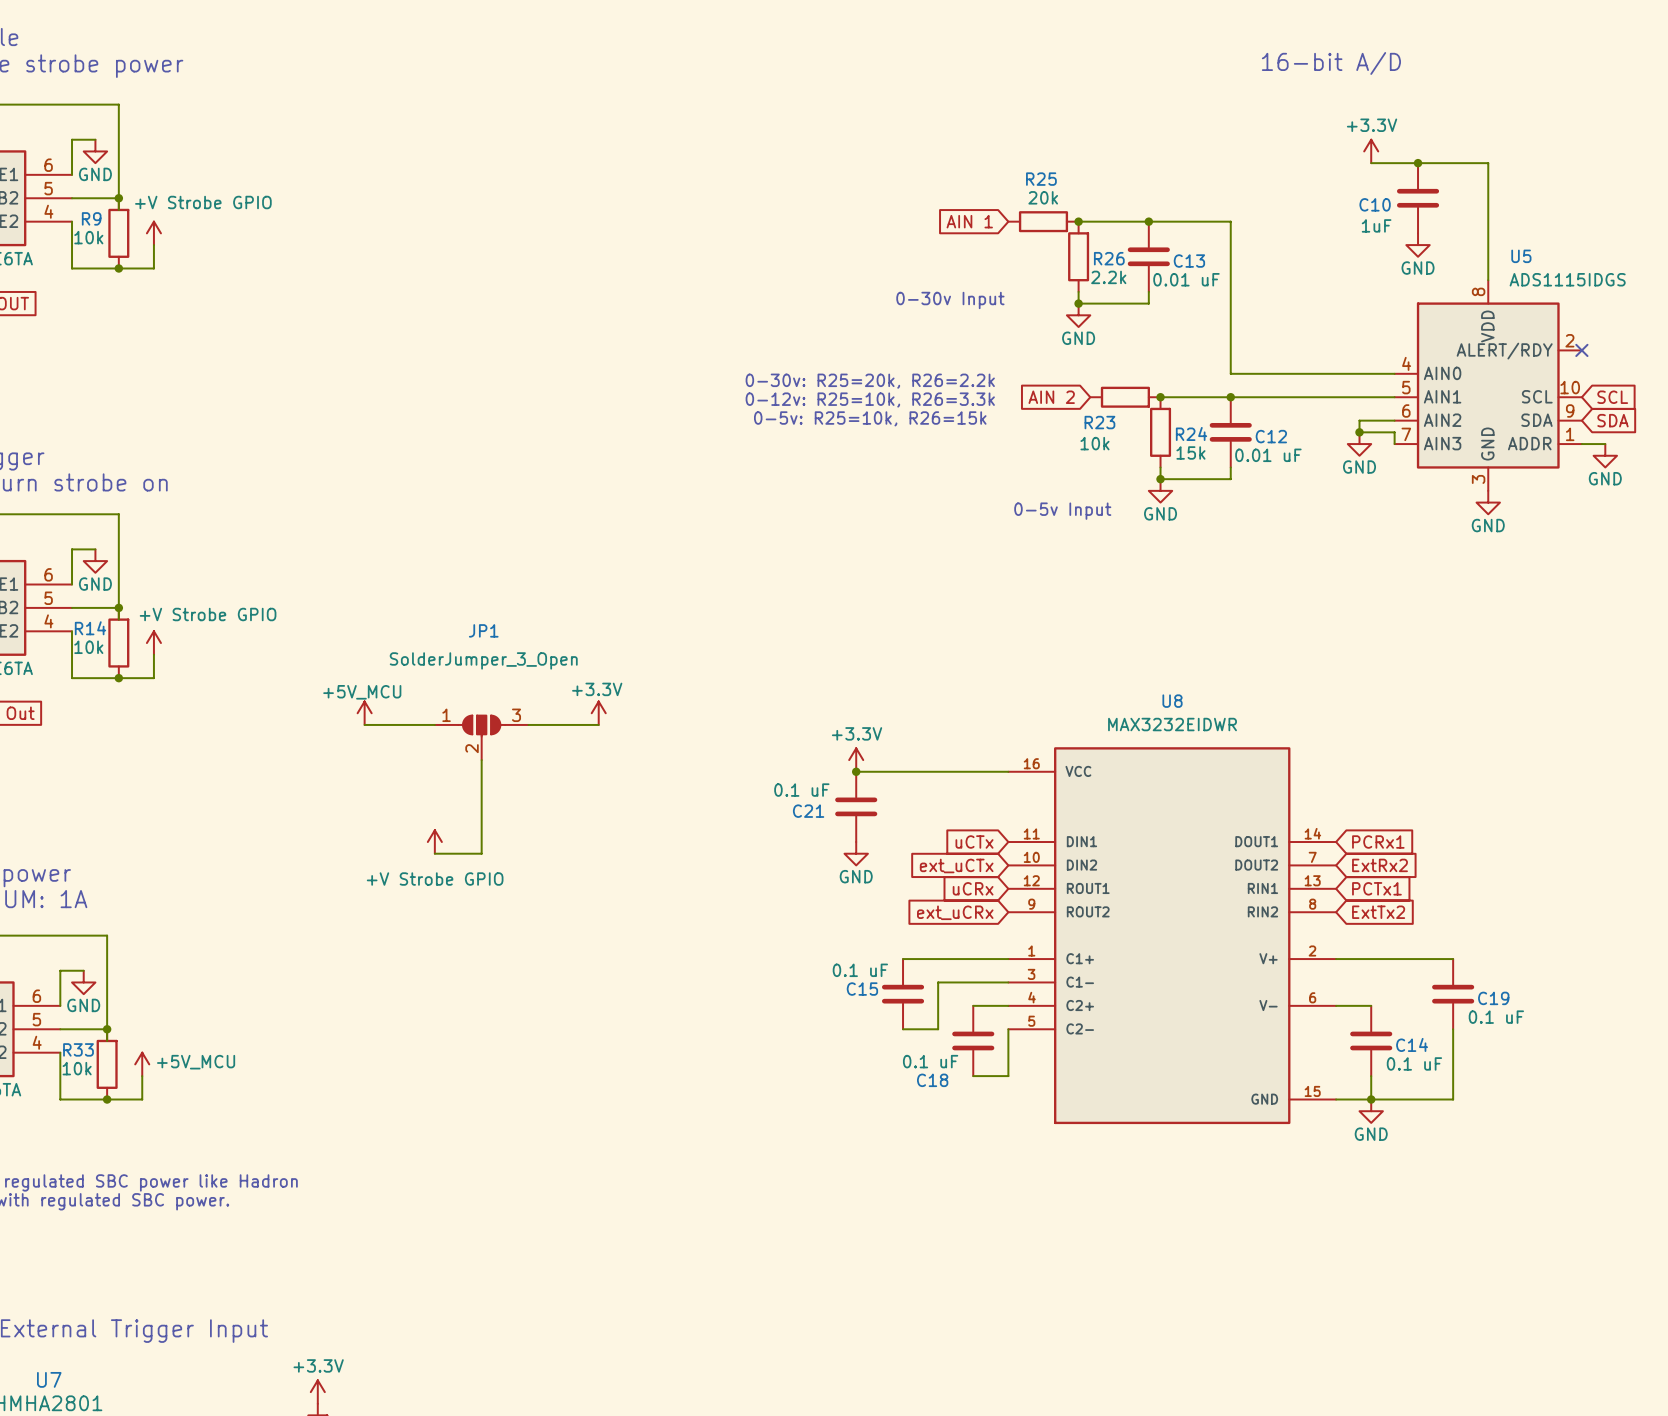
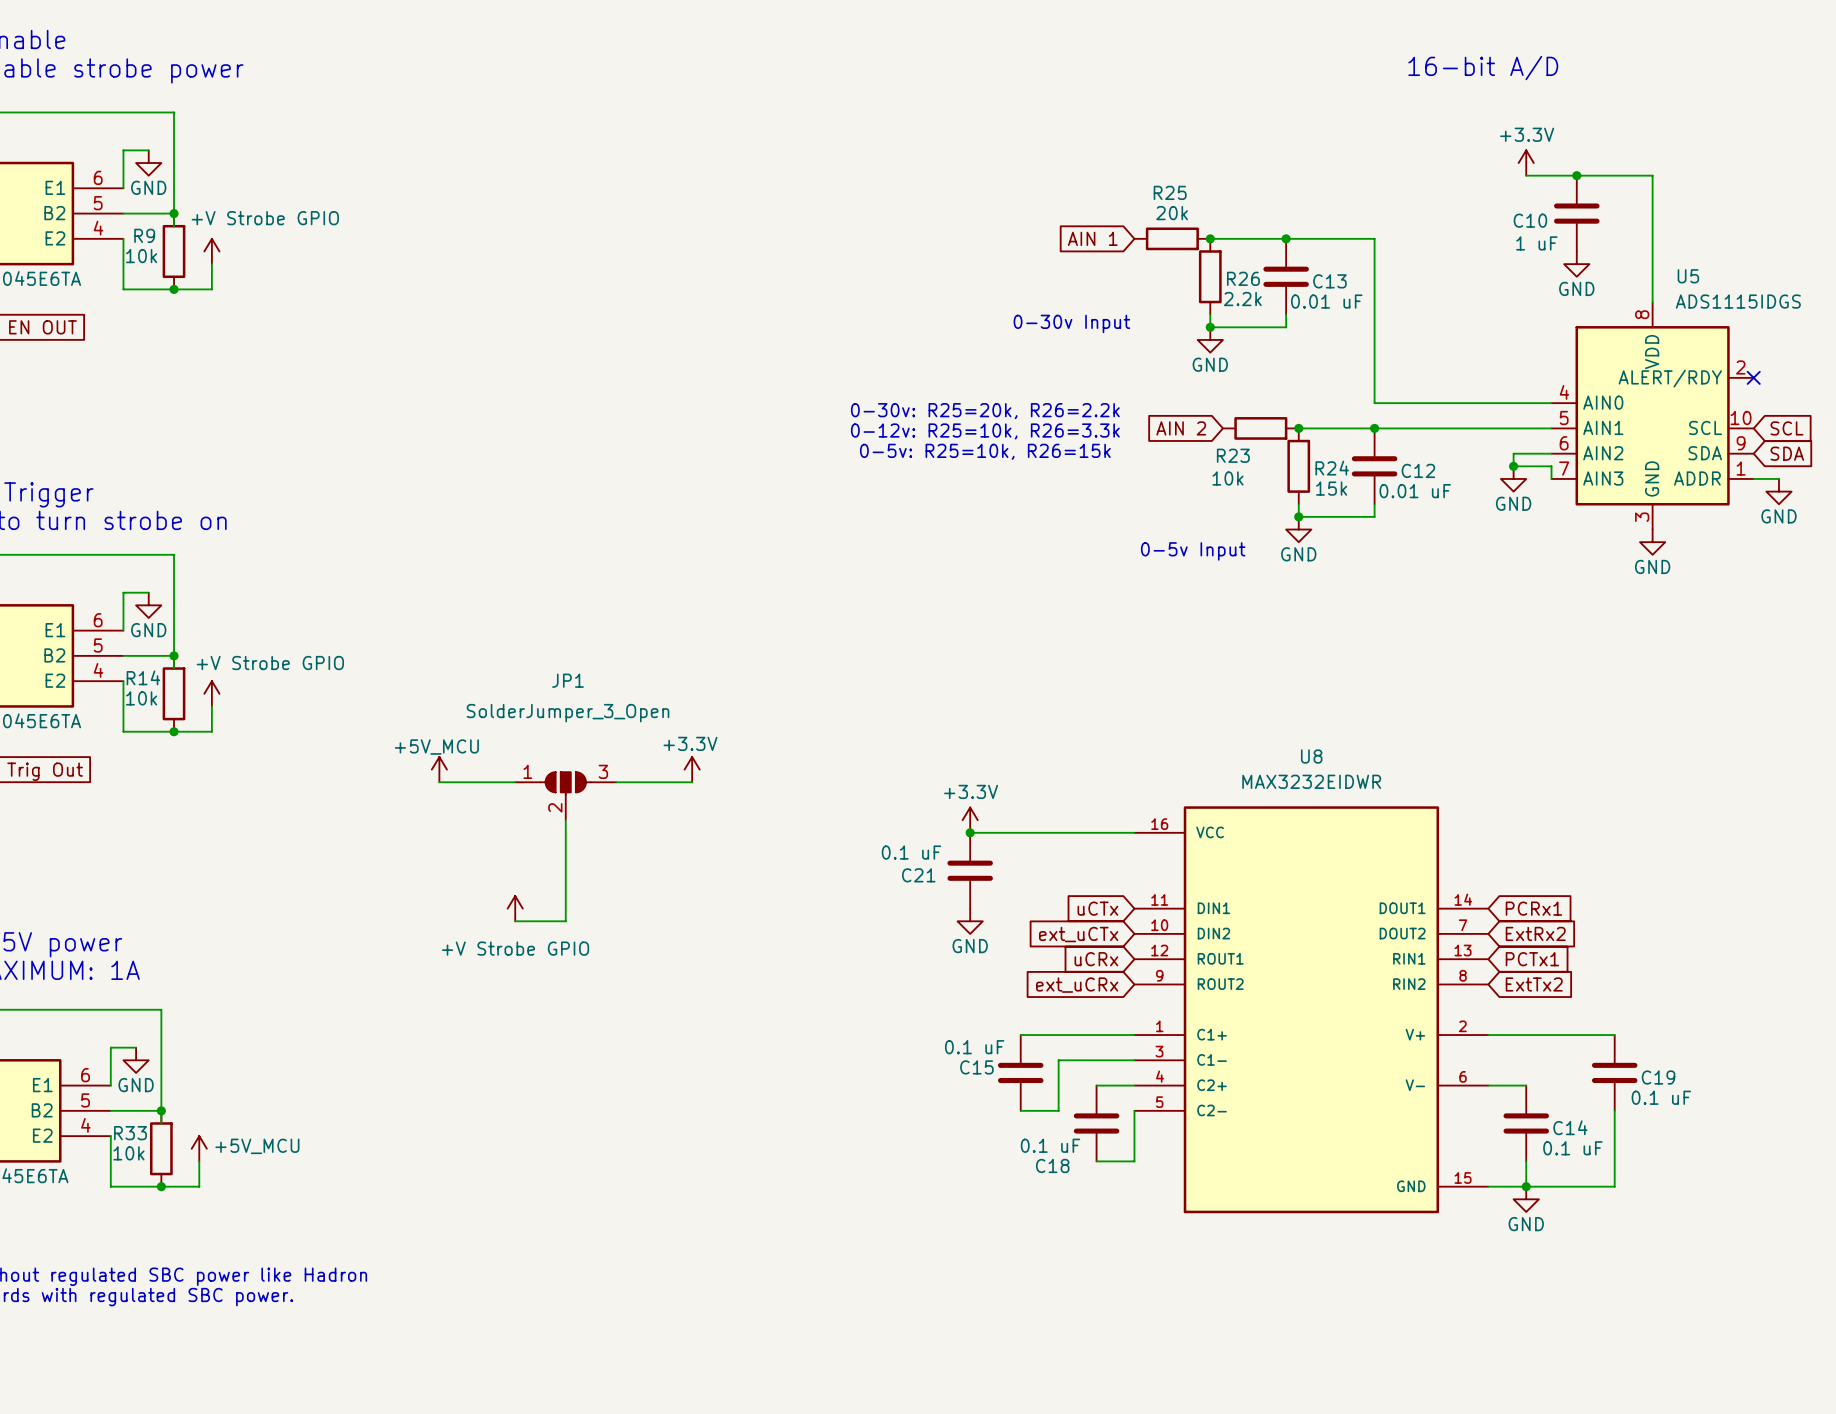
C10 value: 1uF (1376, 225) -> 1 uF (1536, 243)

